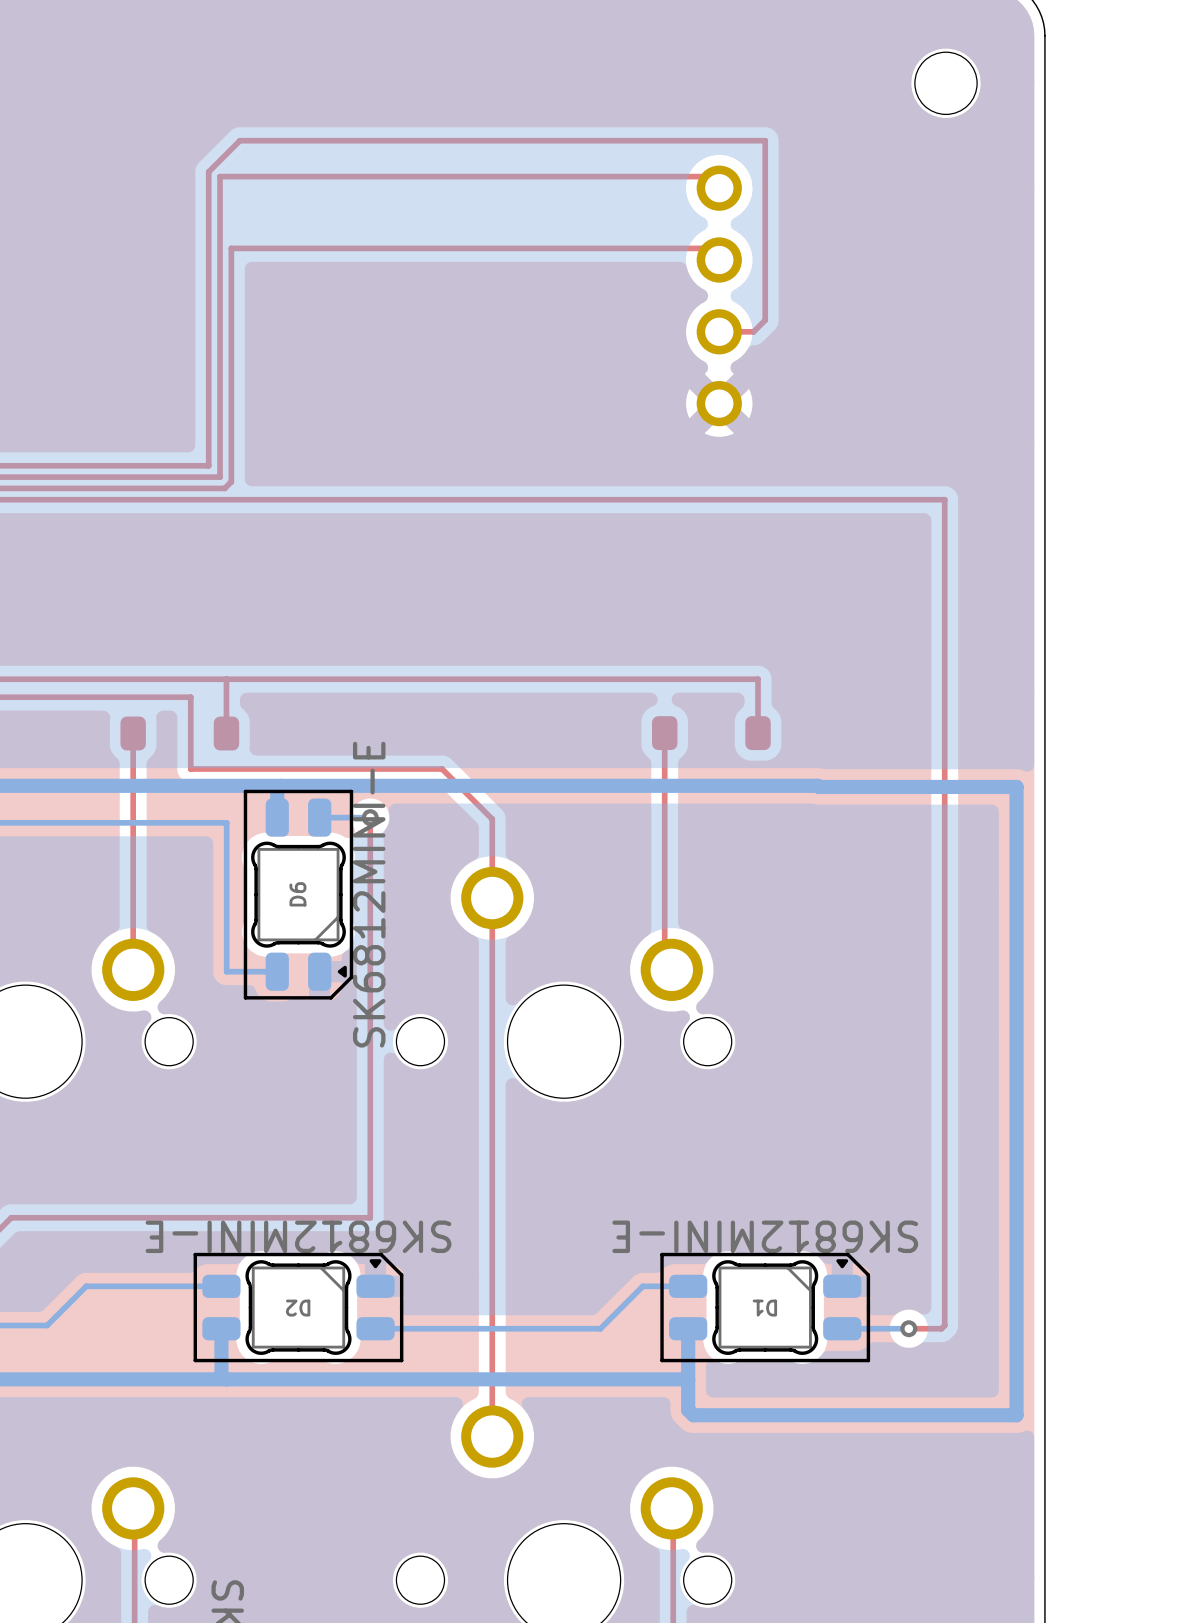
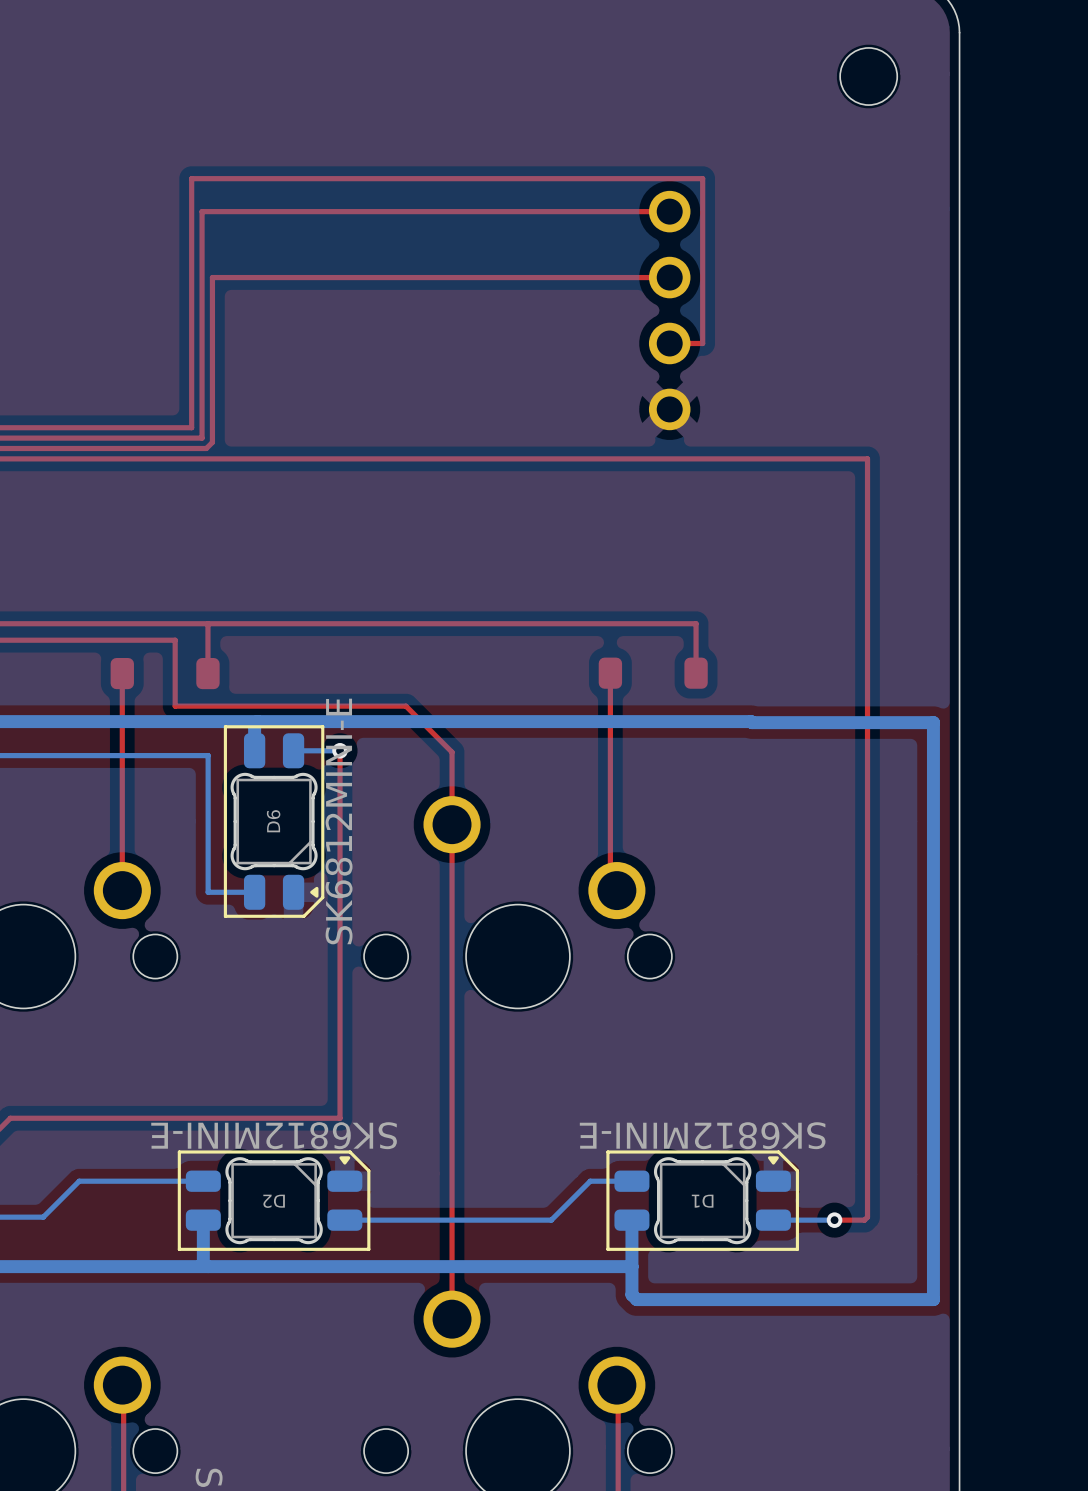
top track: (719, 188) (707, 176) (220, 176) (220, 230) -> (669, 211) (202, 211)
top track: (765, 194) (765, 140) (239, 140) (208, 171) (208, 194) -> (702, 178) (191, 178)
top track: (719, 259) (707, 248) (231, 248) (231, 302) -> (669, 277) (212, 277)
part position: (719, 295) -> (669, 310)
top track: (765, 320) (753, 331) (719, 331) -> (702, 294) (702, 343) (669, 343)

